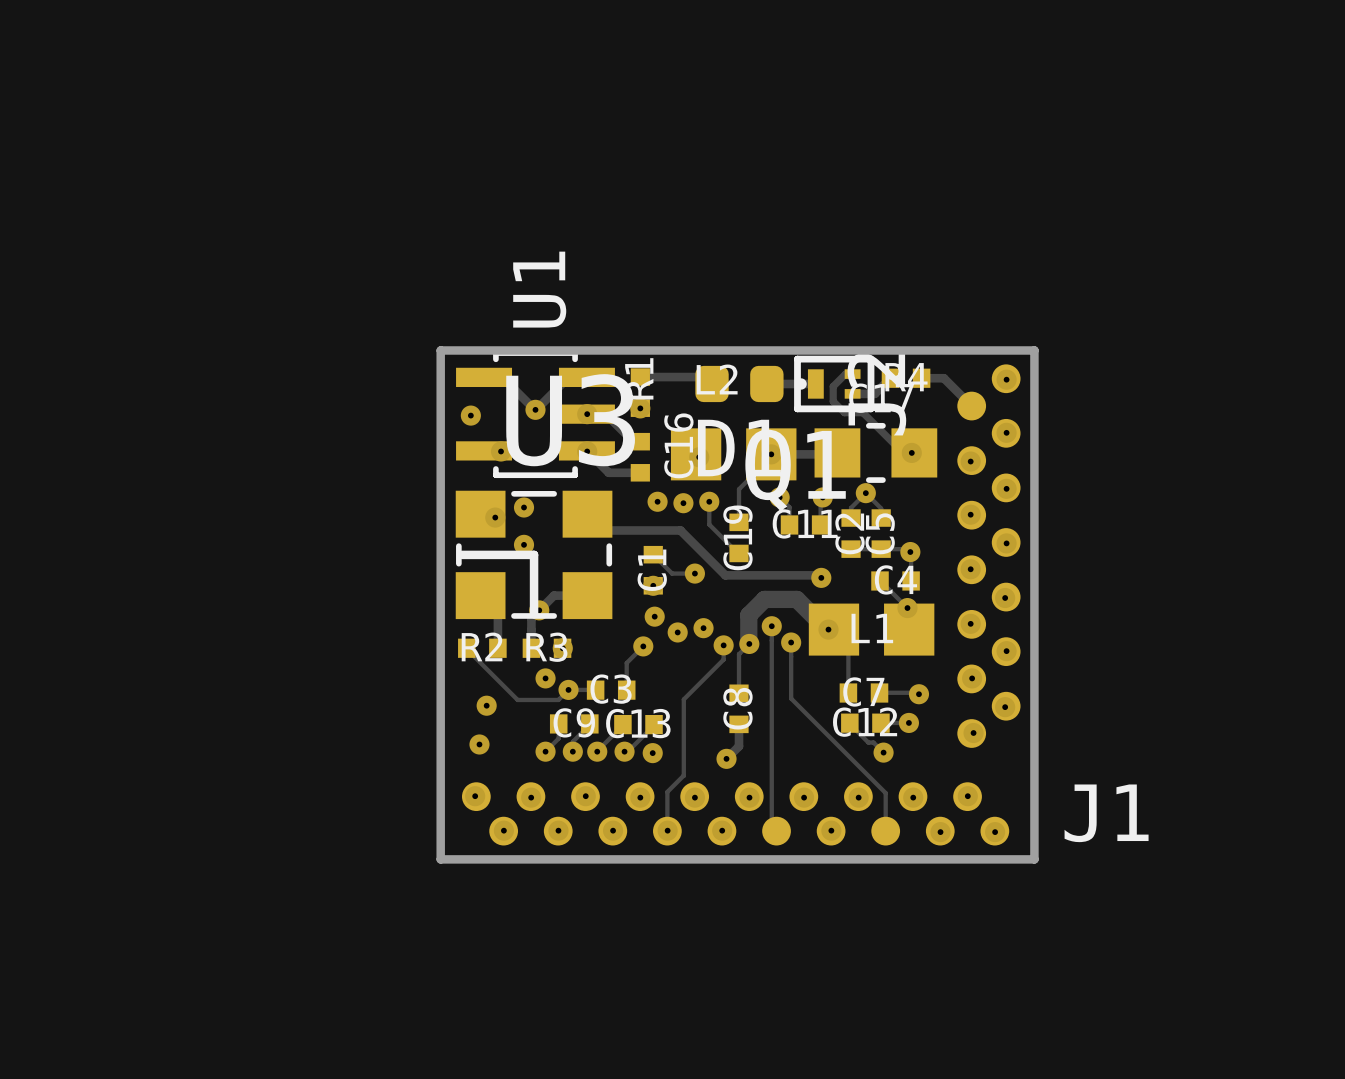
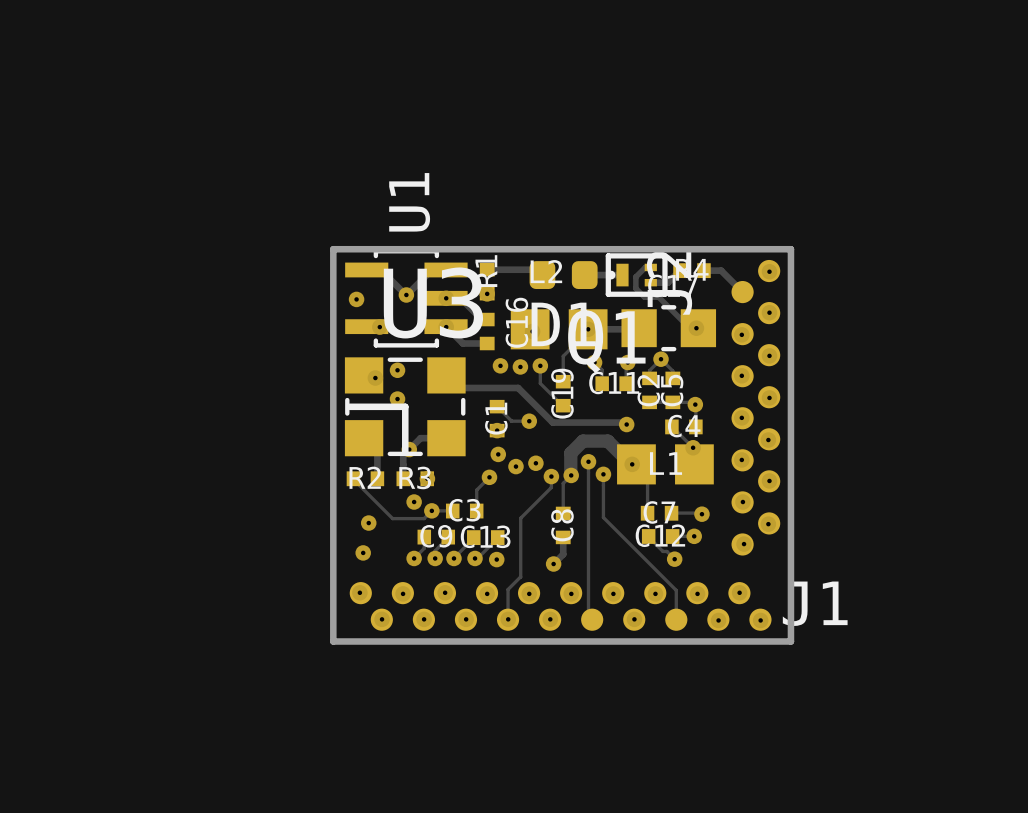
J1 name position: J1 (1106, 813) -> J1 (815, 603)

